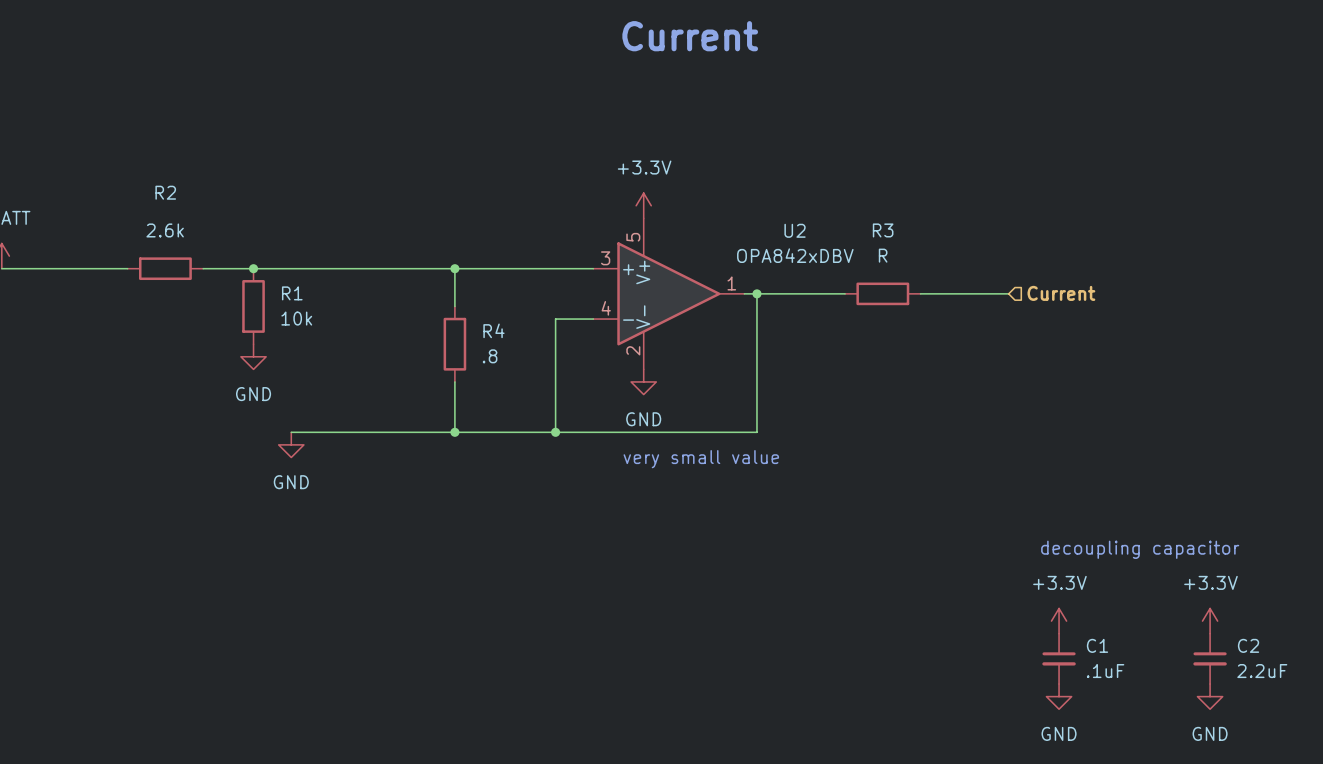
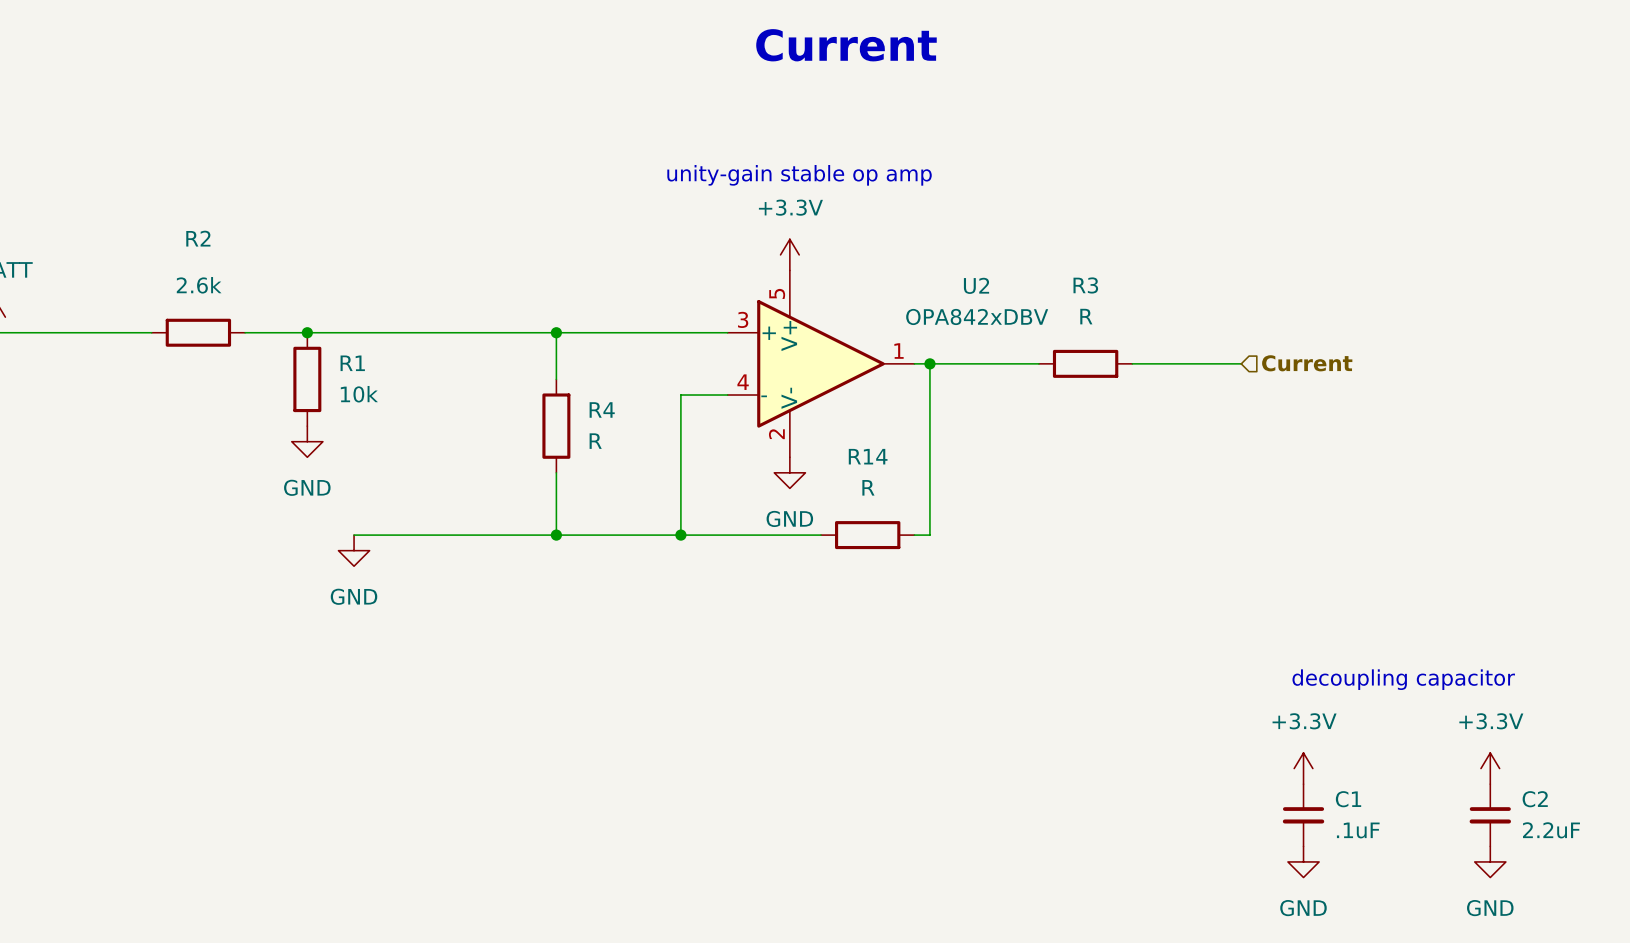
text: none -> unity-gain stable op amp (799, 175)
R4 value: .8 (490, 356) -> R (595, 441)
wire: (668, 432) (744, 432) -> none
R14: none -> R (867, 535)
text: very small value (701, 459) -> none

